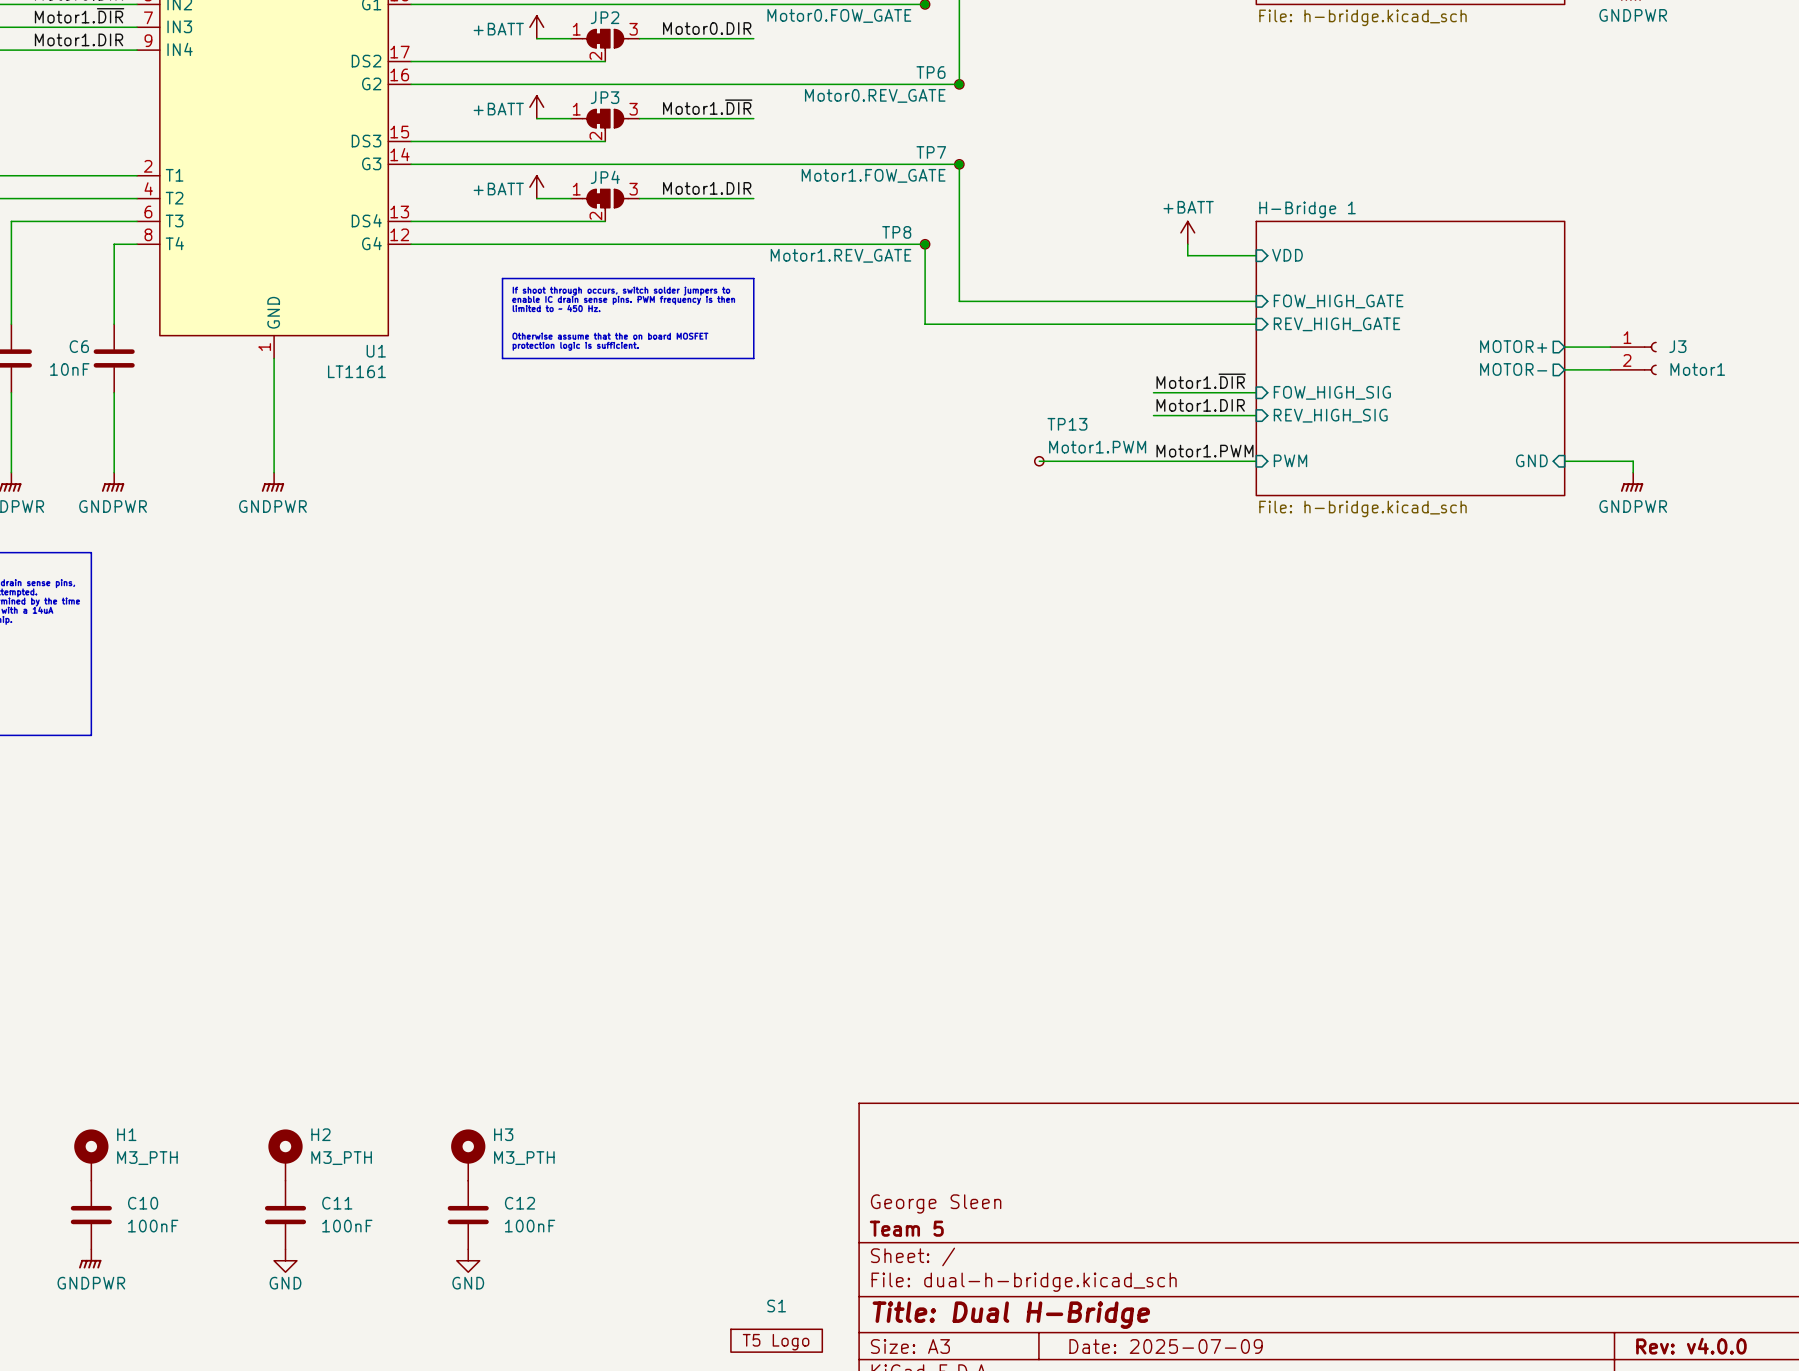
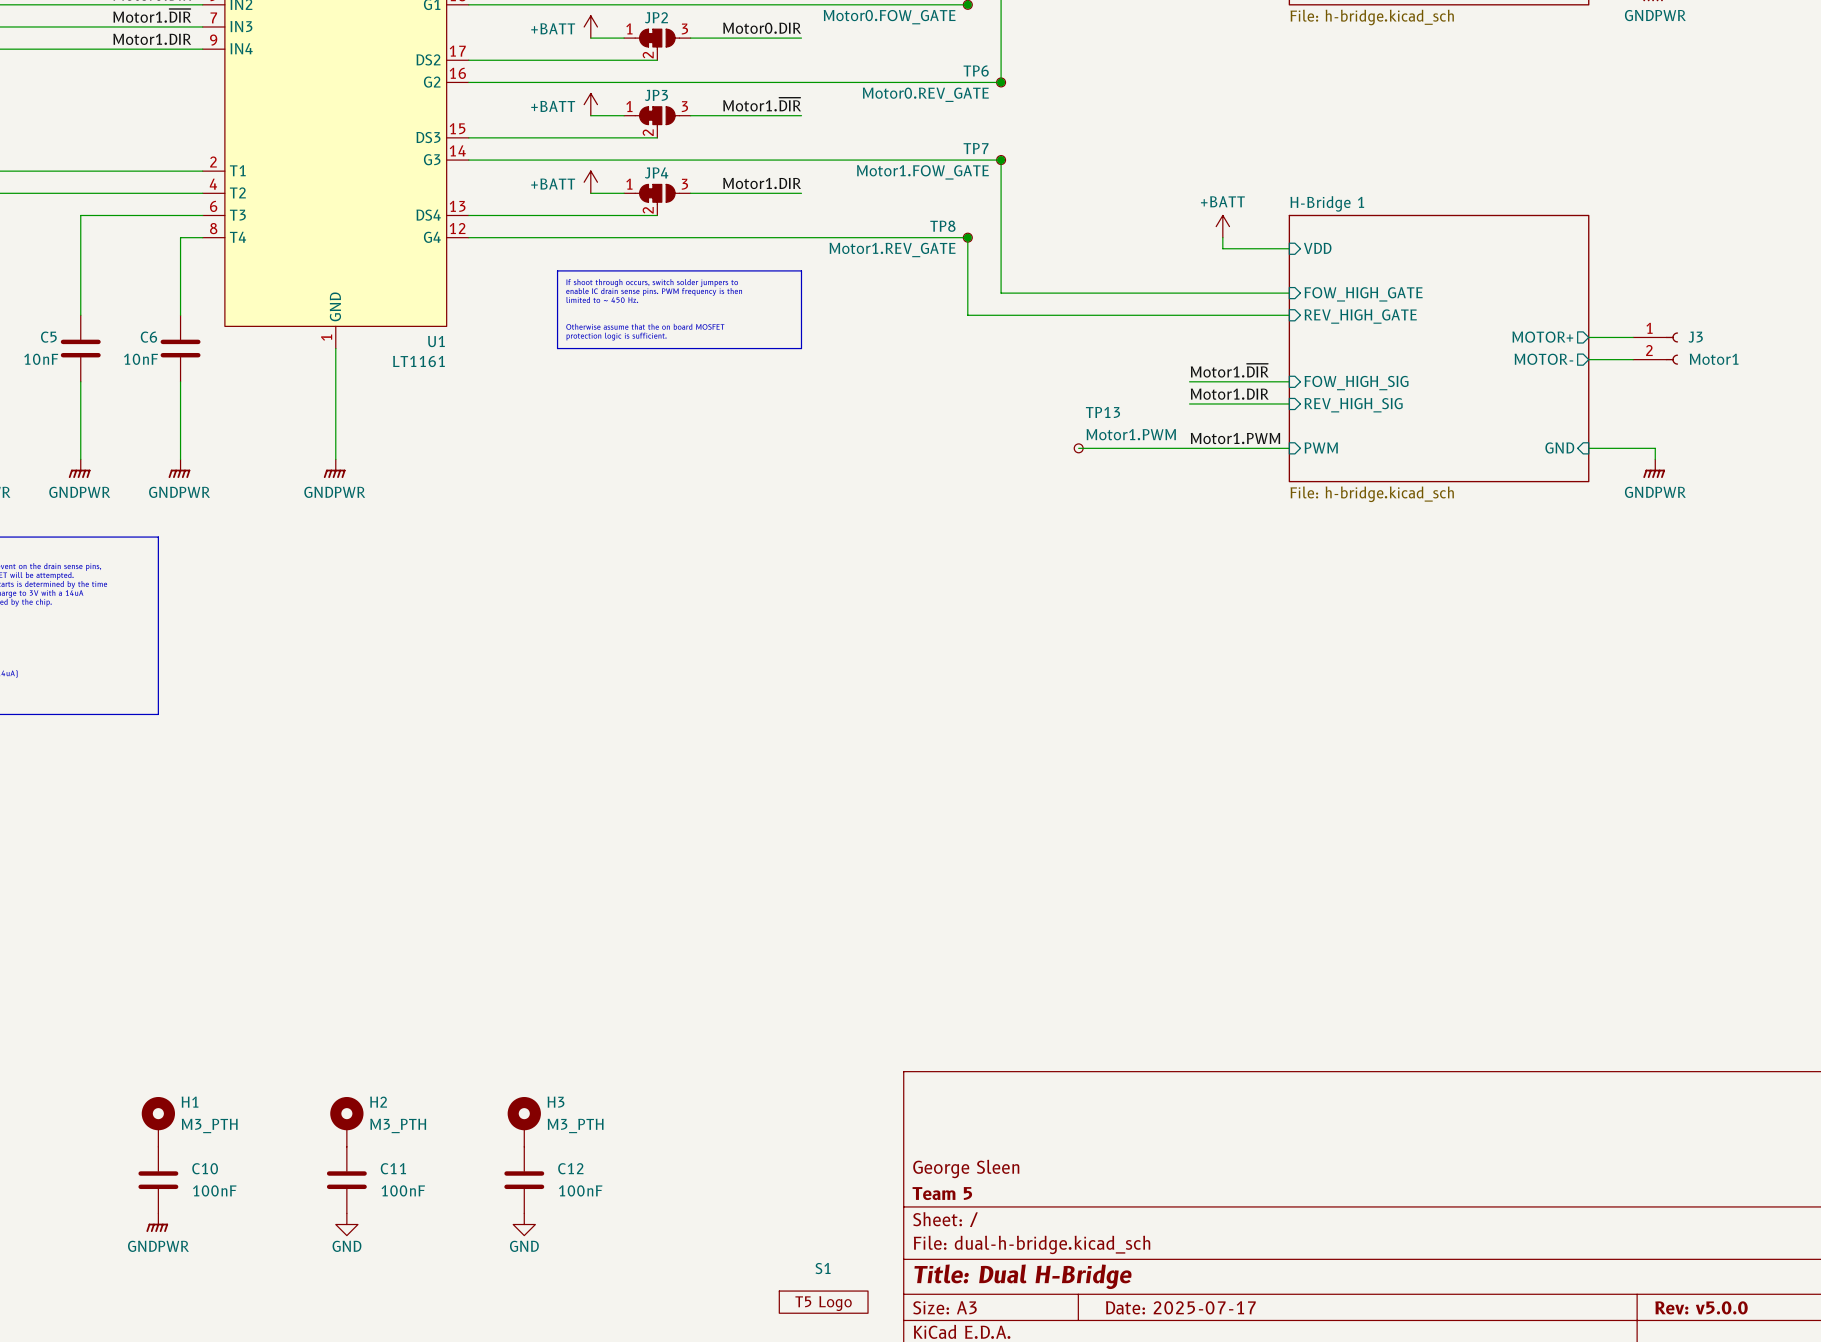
title block: Date: 2025-07-09 (1166, 1346) -> Date: 2025-07-17 (1180, 1307)
title block: Rev: v4.0.0 (1691, 1346) -> Rev: v5.0.0 (1701, 1307)

